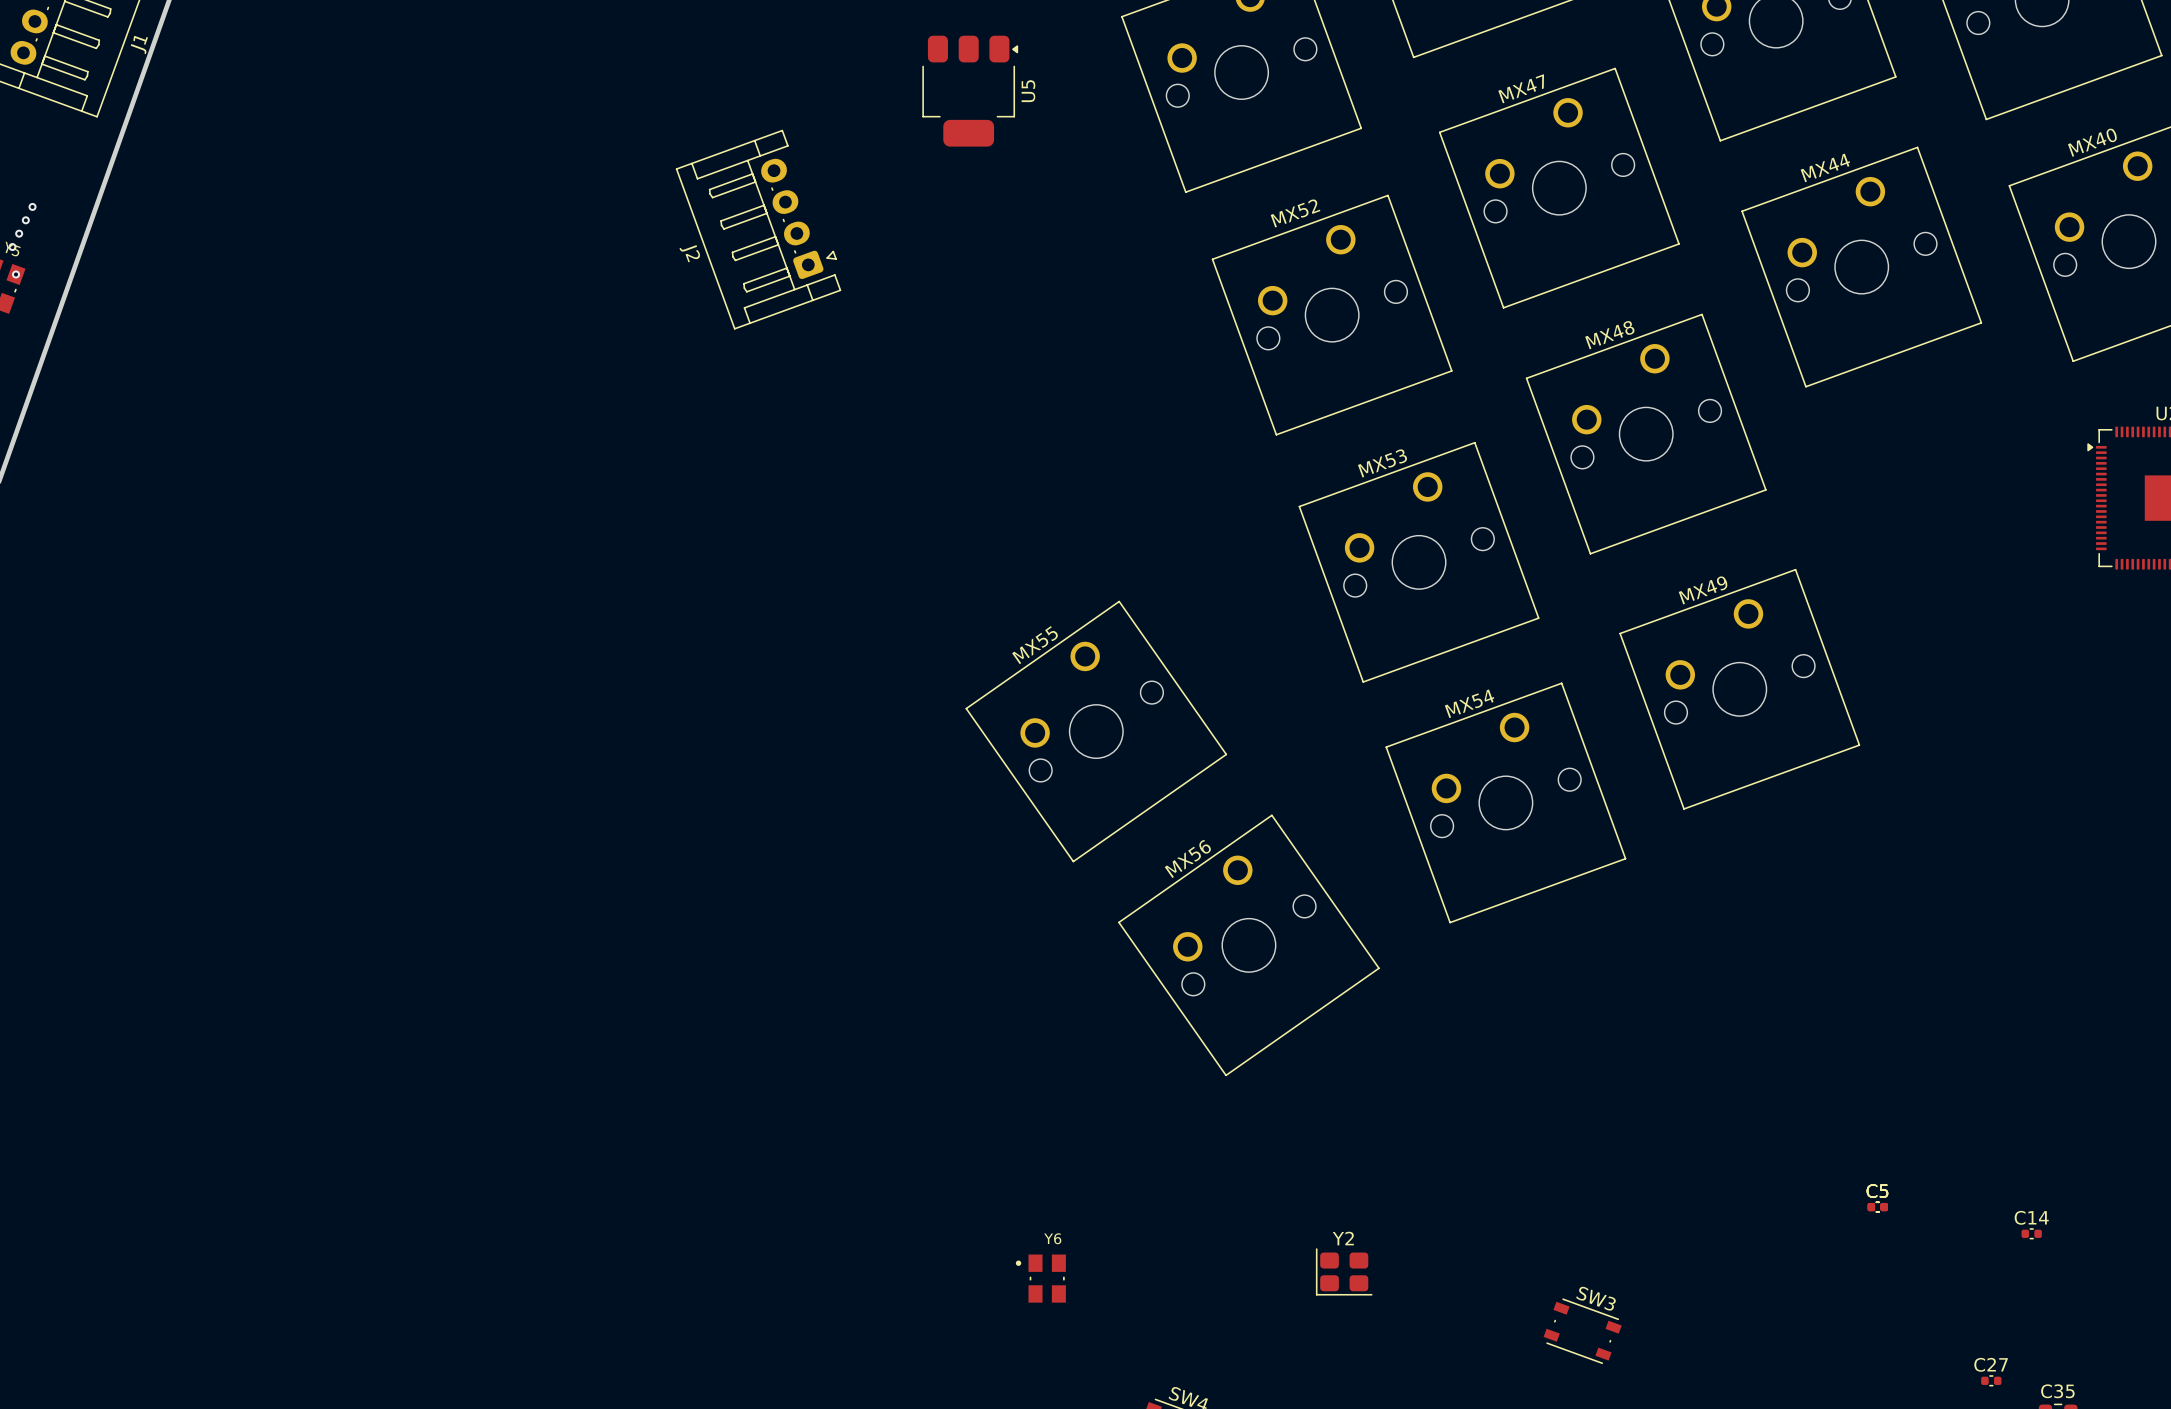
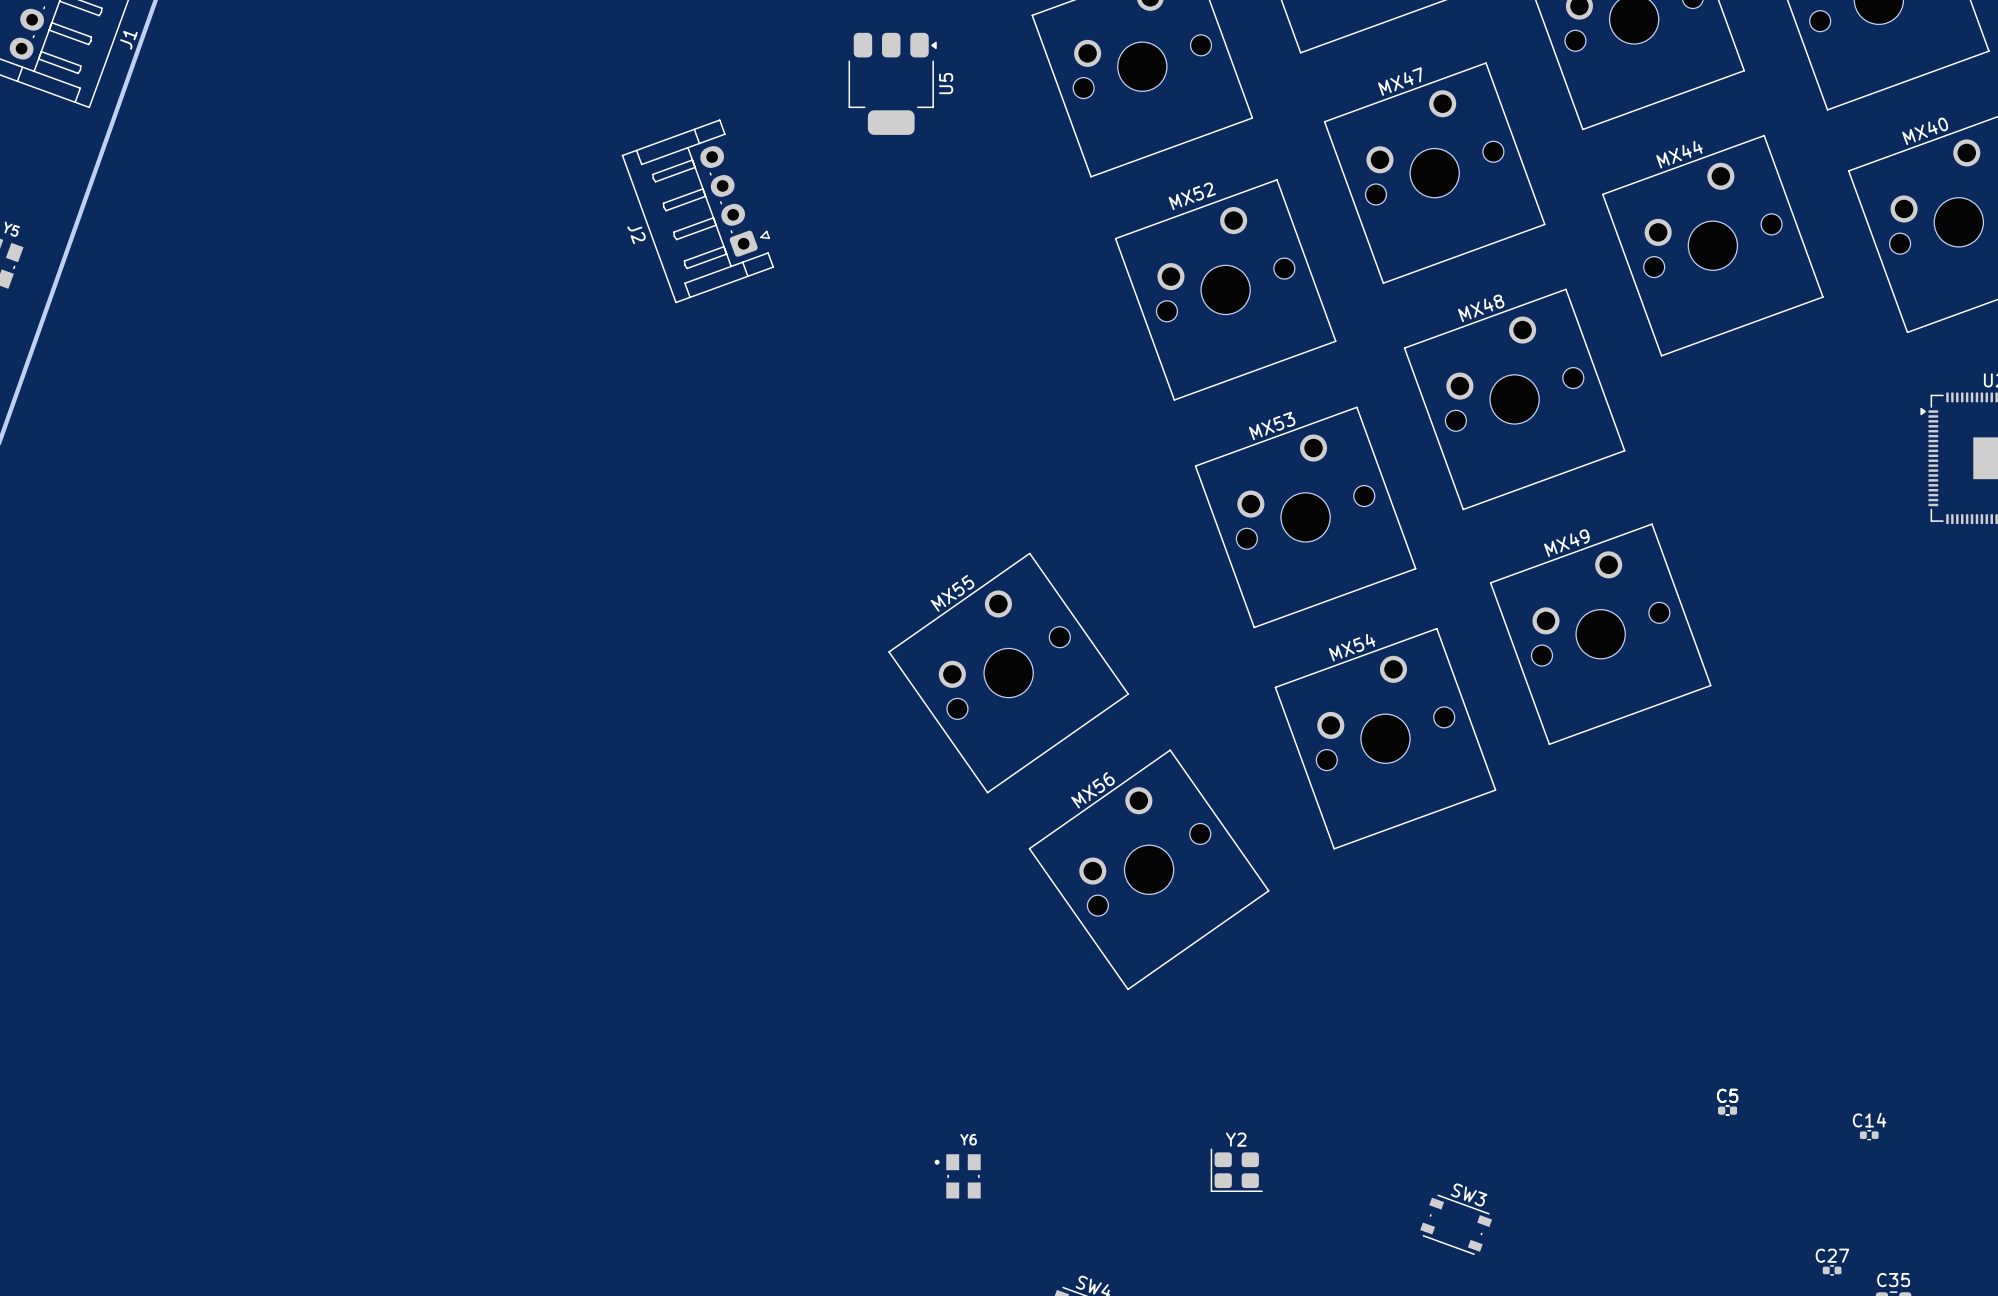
via: (32, 206) -> none
via: (25, 220) -> none
via: (19, 233) -> none
via: (12, 247) -> none
via: (16, 274) -> none

